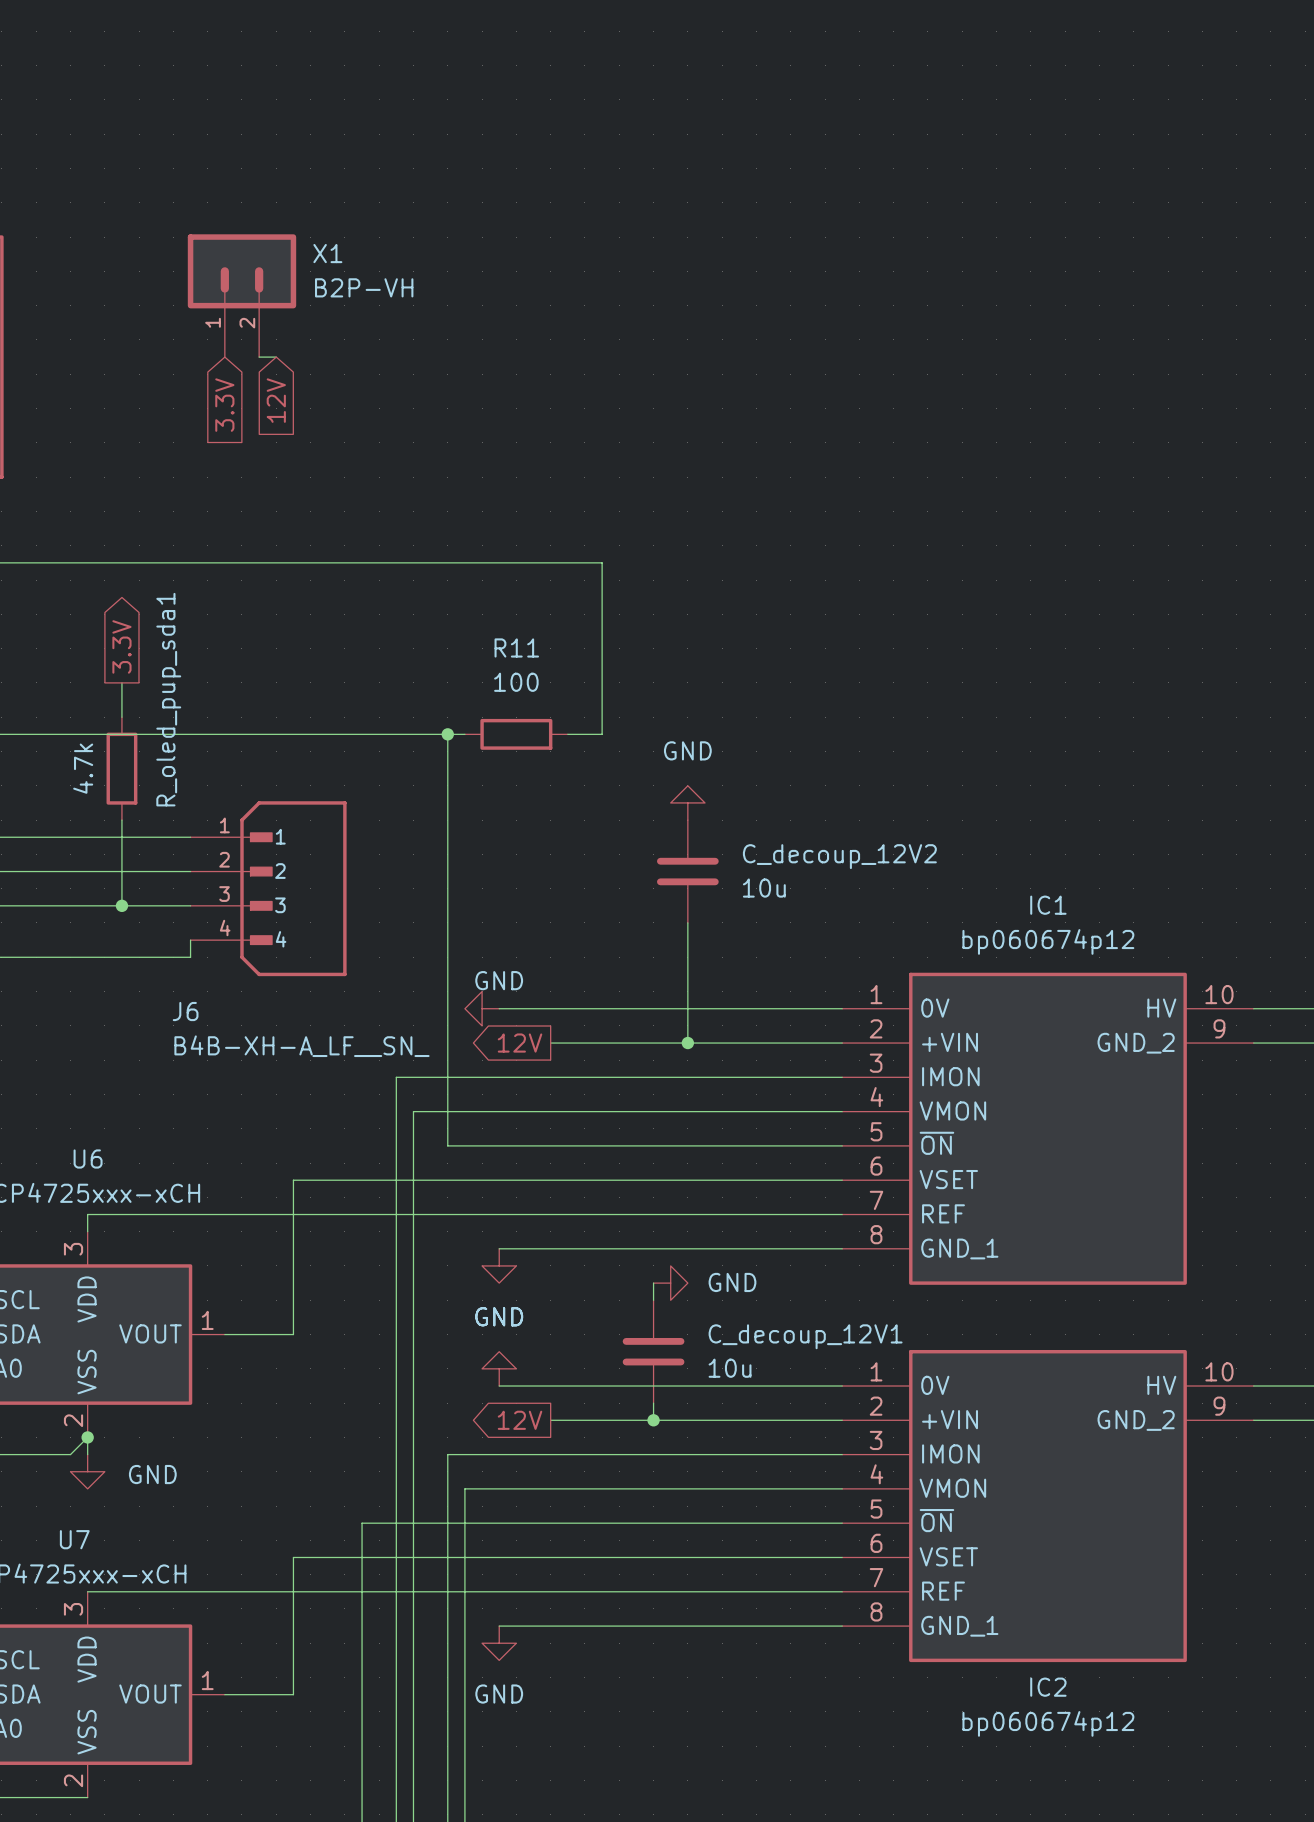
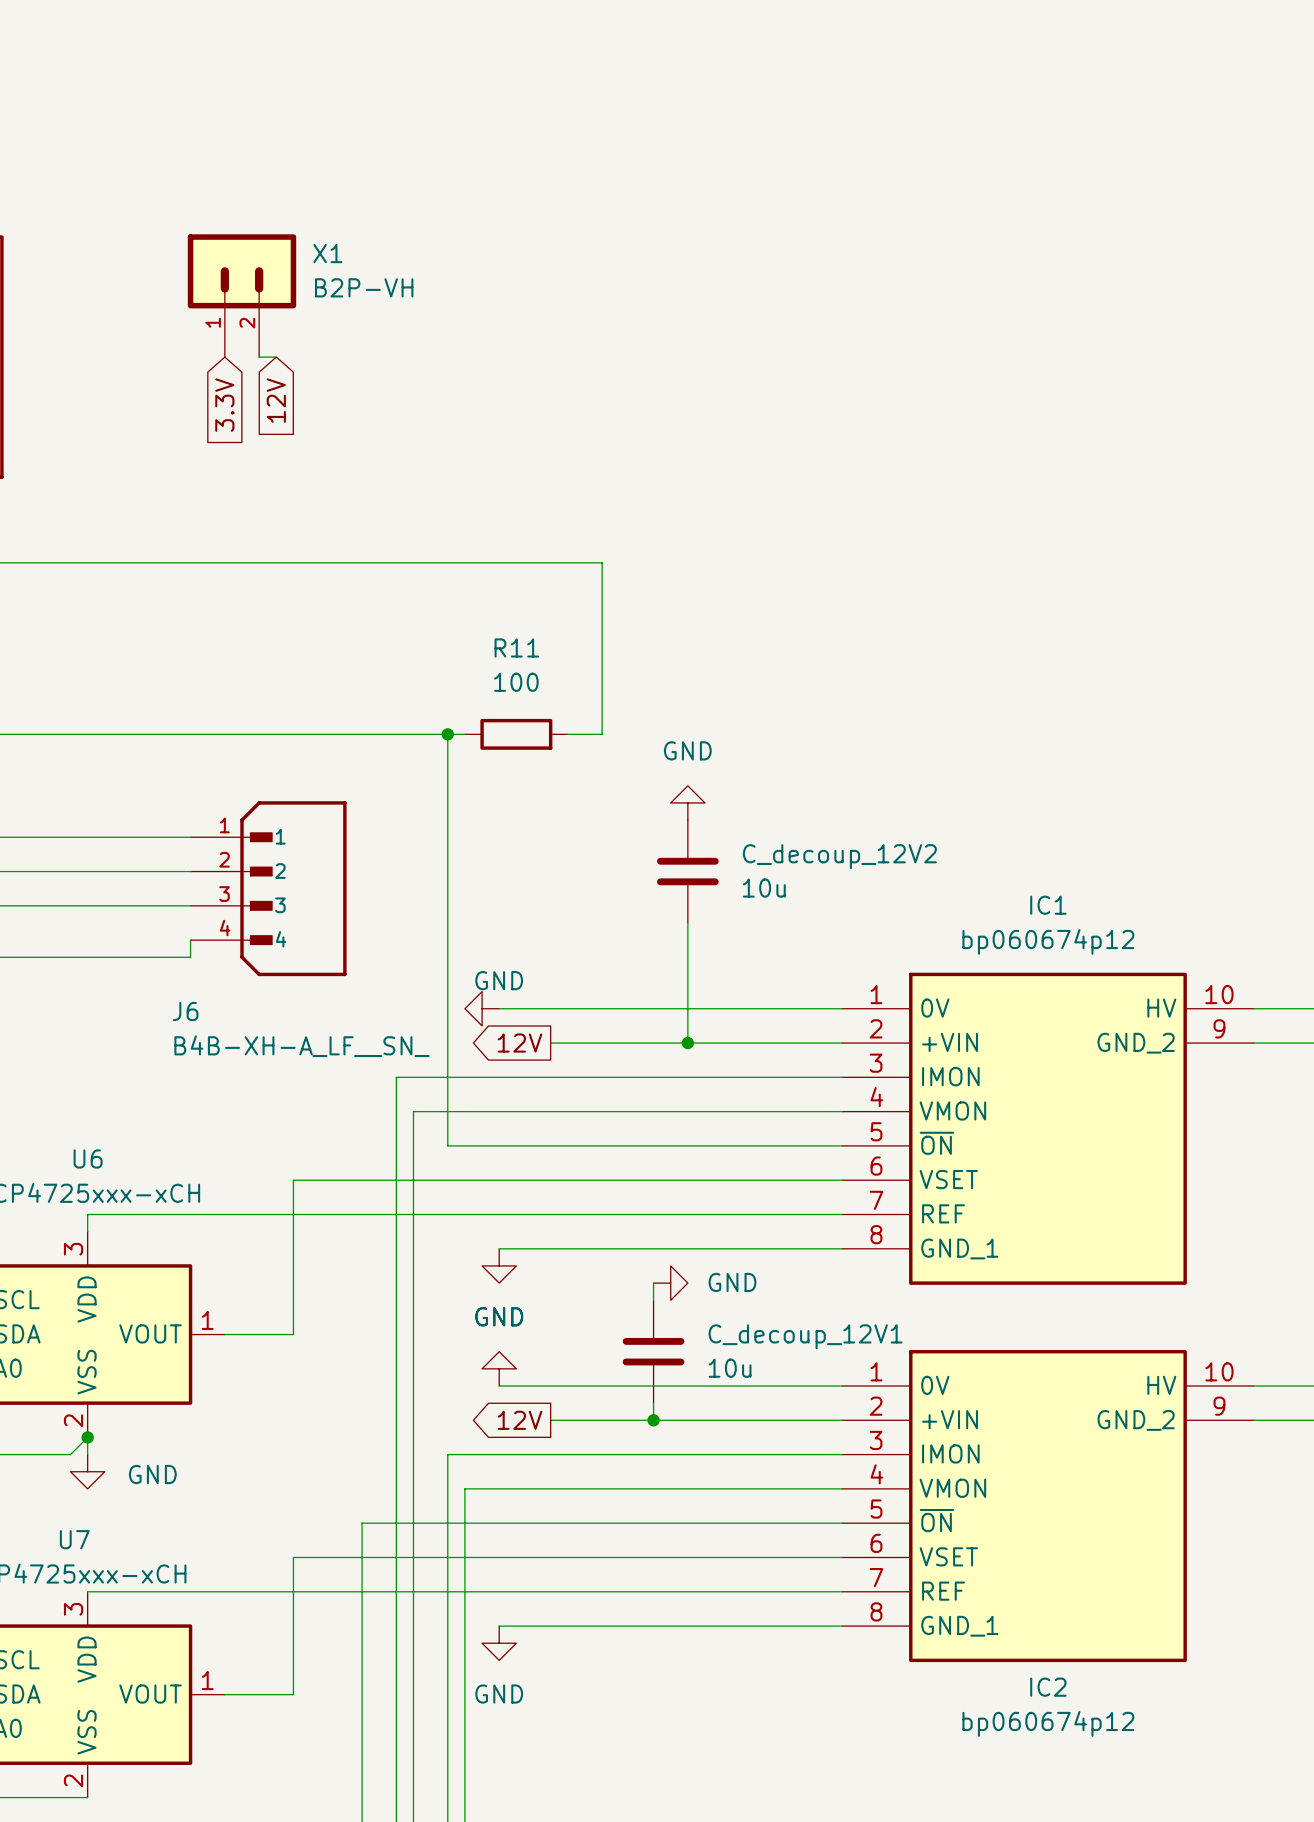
global label: 3.3V (121, 646) -> none
wire: (121, 682) (121, 717) -> none
R_oled_pup_sda1: 4.7k (121, 768) -> none
wire: (121, 820) (121, 905) -> none
junction: (121, 905) -> none

